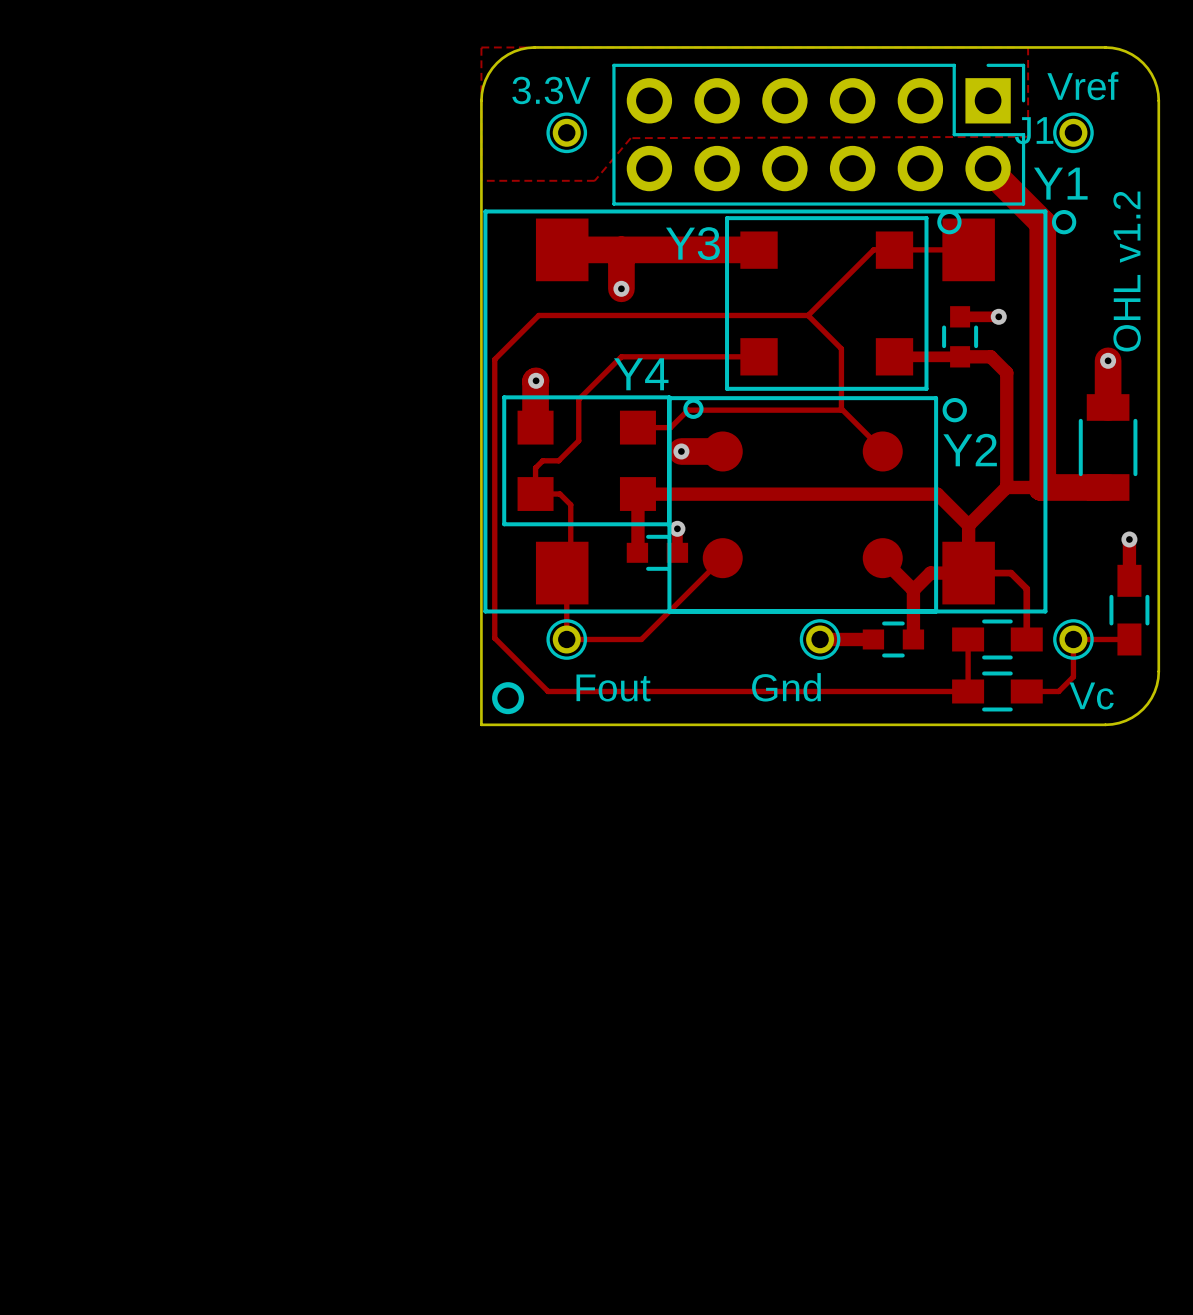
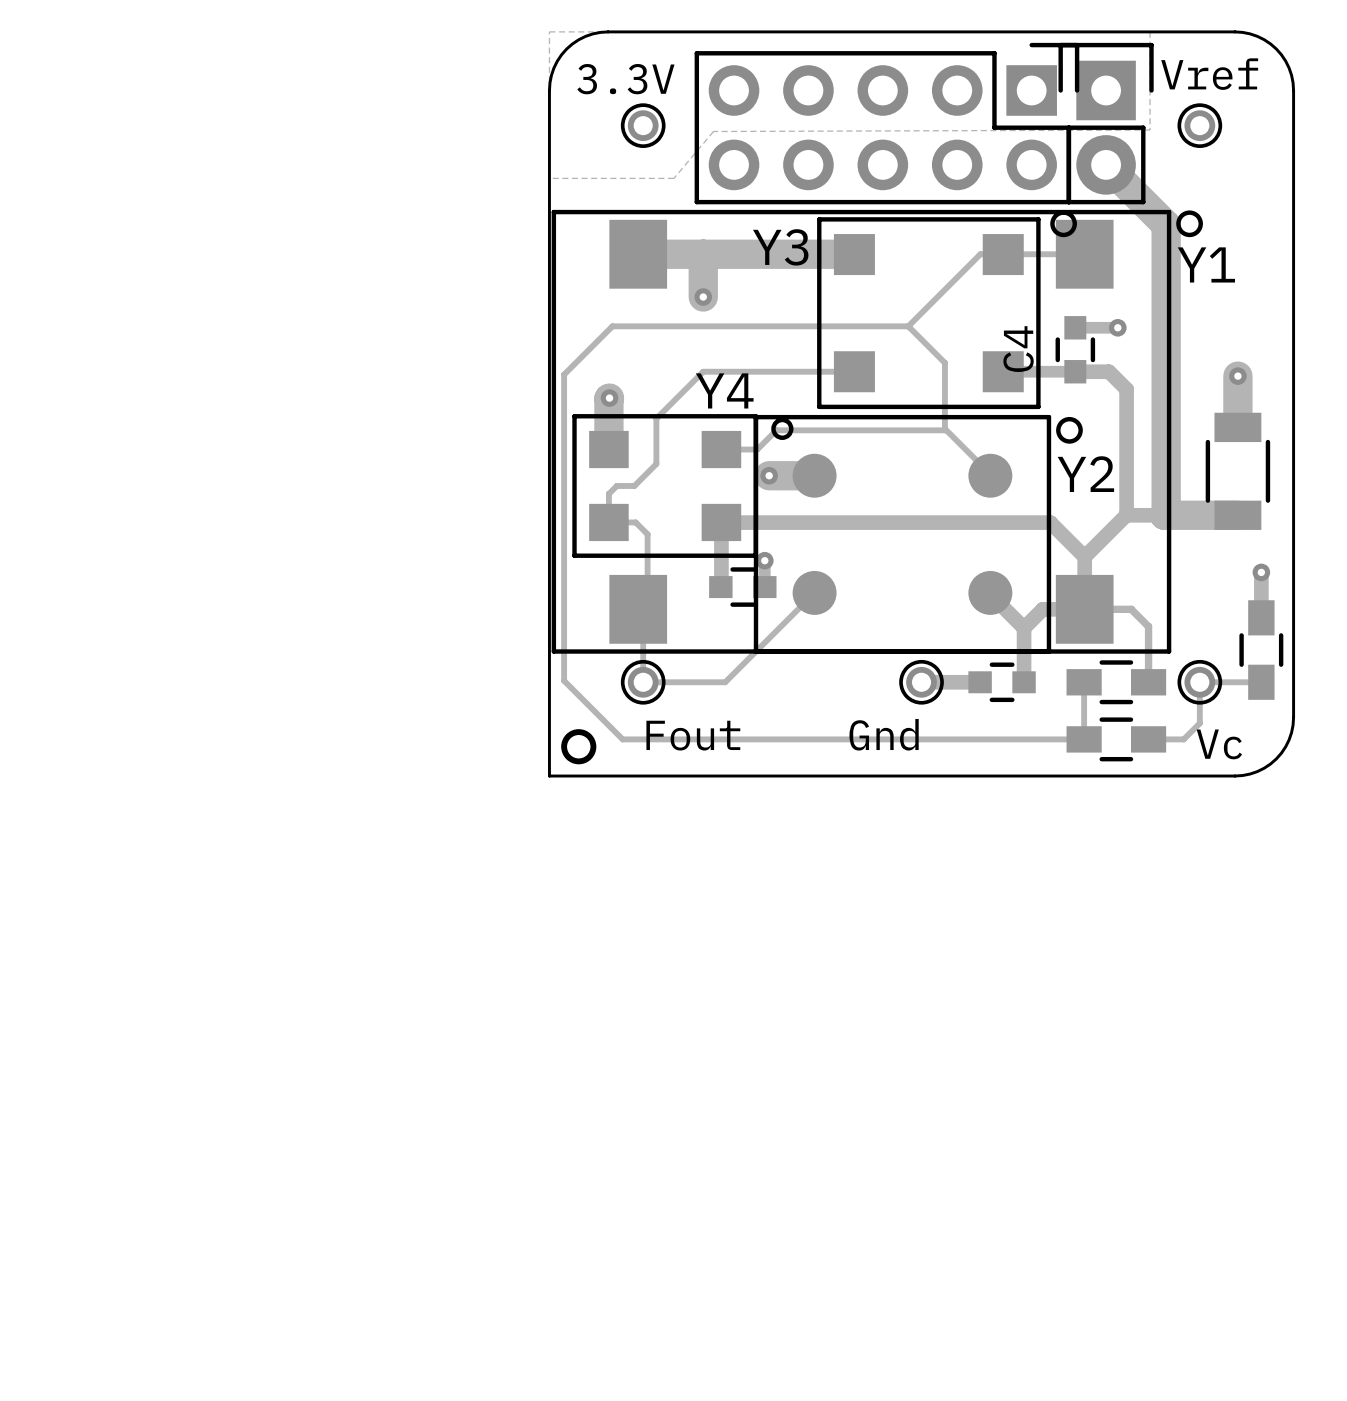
part: none -> (886, 123)
part: none -> (1106, 123)
J1: (818, 134) -> none
Y1 name position: Y1 (1060, 183) -> Y1 (1206, 264)
text: OHL v1.2 (1127, 271) -> none
C4 name: none -> C4 (1018, 349)

